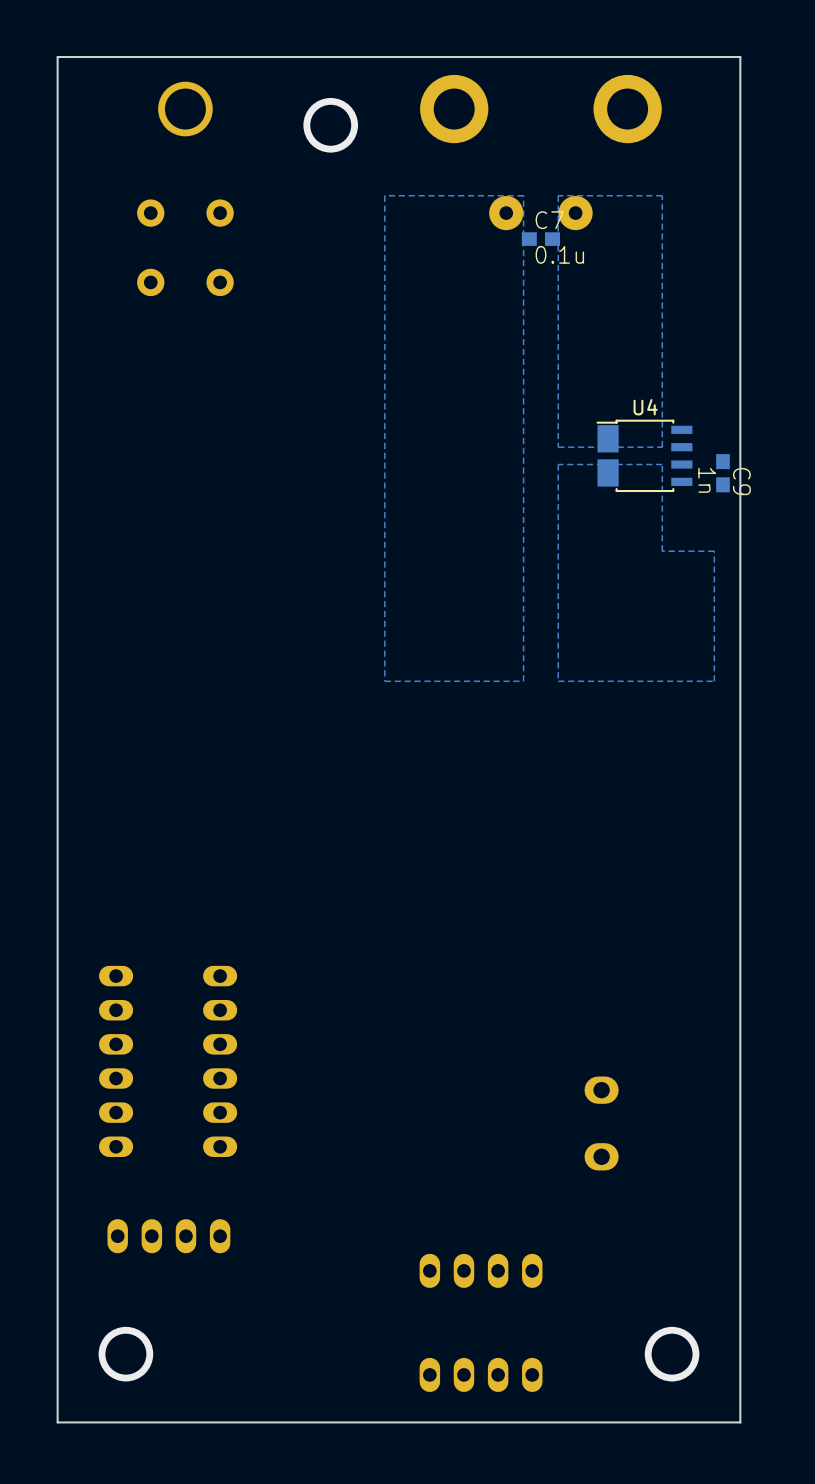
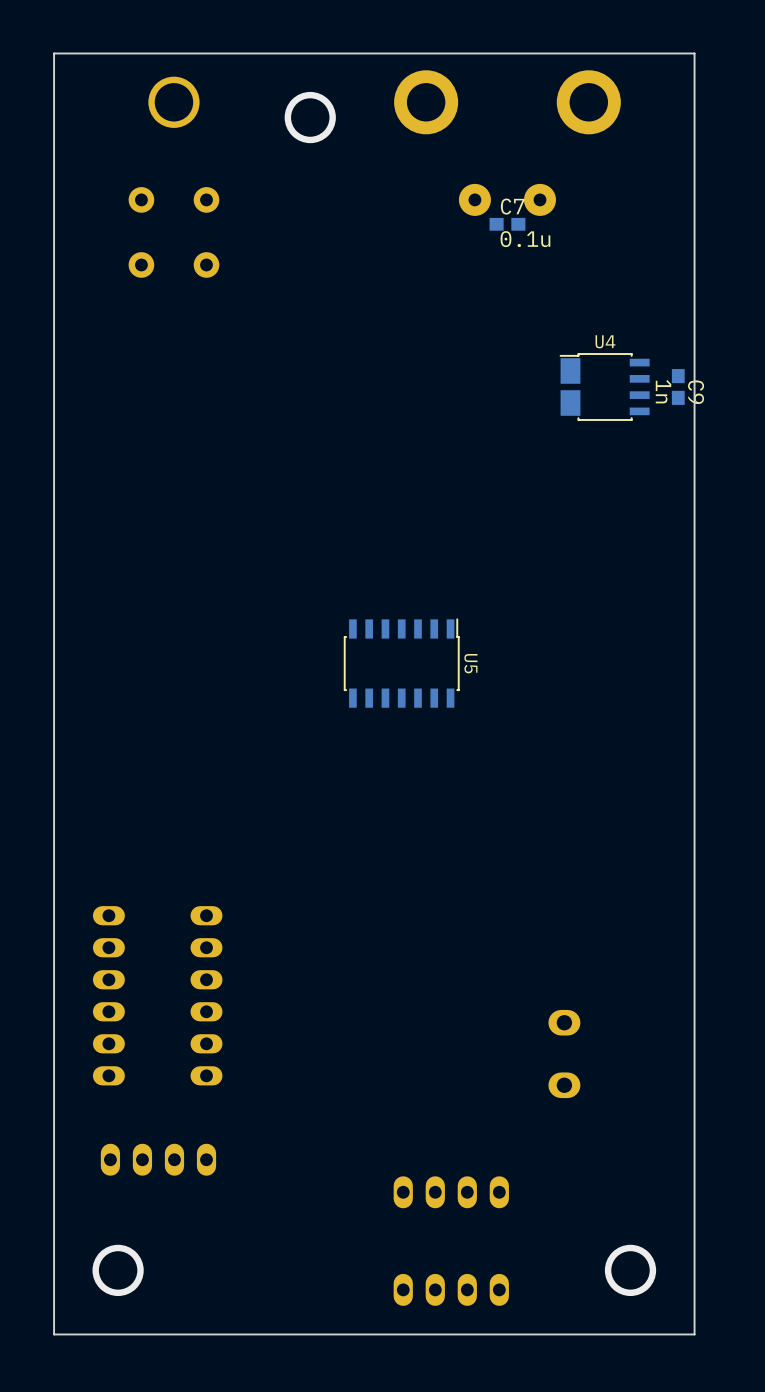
zone outline: (523, 195) (523, 681) (384, 681) (384, 195) (523, 195) -> none
zone outline: (662, 195) (558, 195) (558, 447) (662, 447) (662, 195) -> none
U4 position: (644, 455) -> (604, 386)
zone outline: (662, 464) (662, 551) (714, 551) (714, 681) (558, 681) (558, 464) (662, 464) -> none
C9 position: (723, 473) -> (678, 386)
U5: none -> (401, 663)

